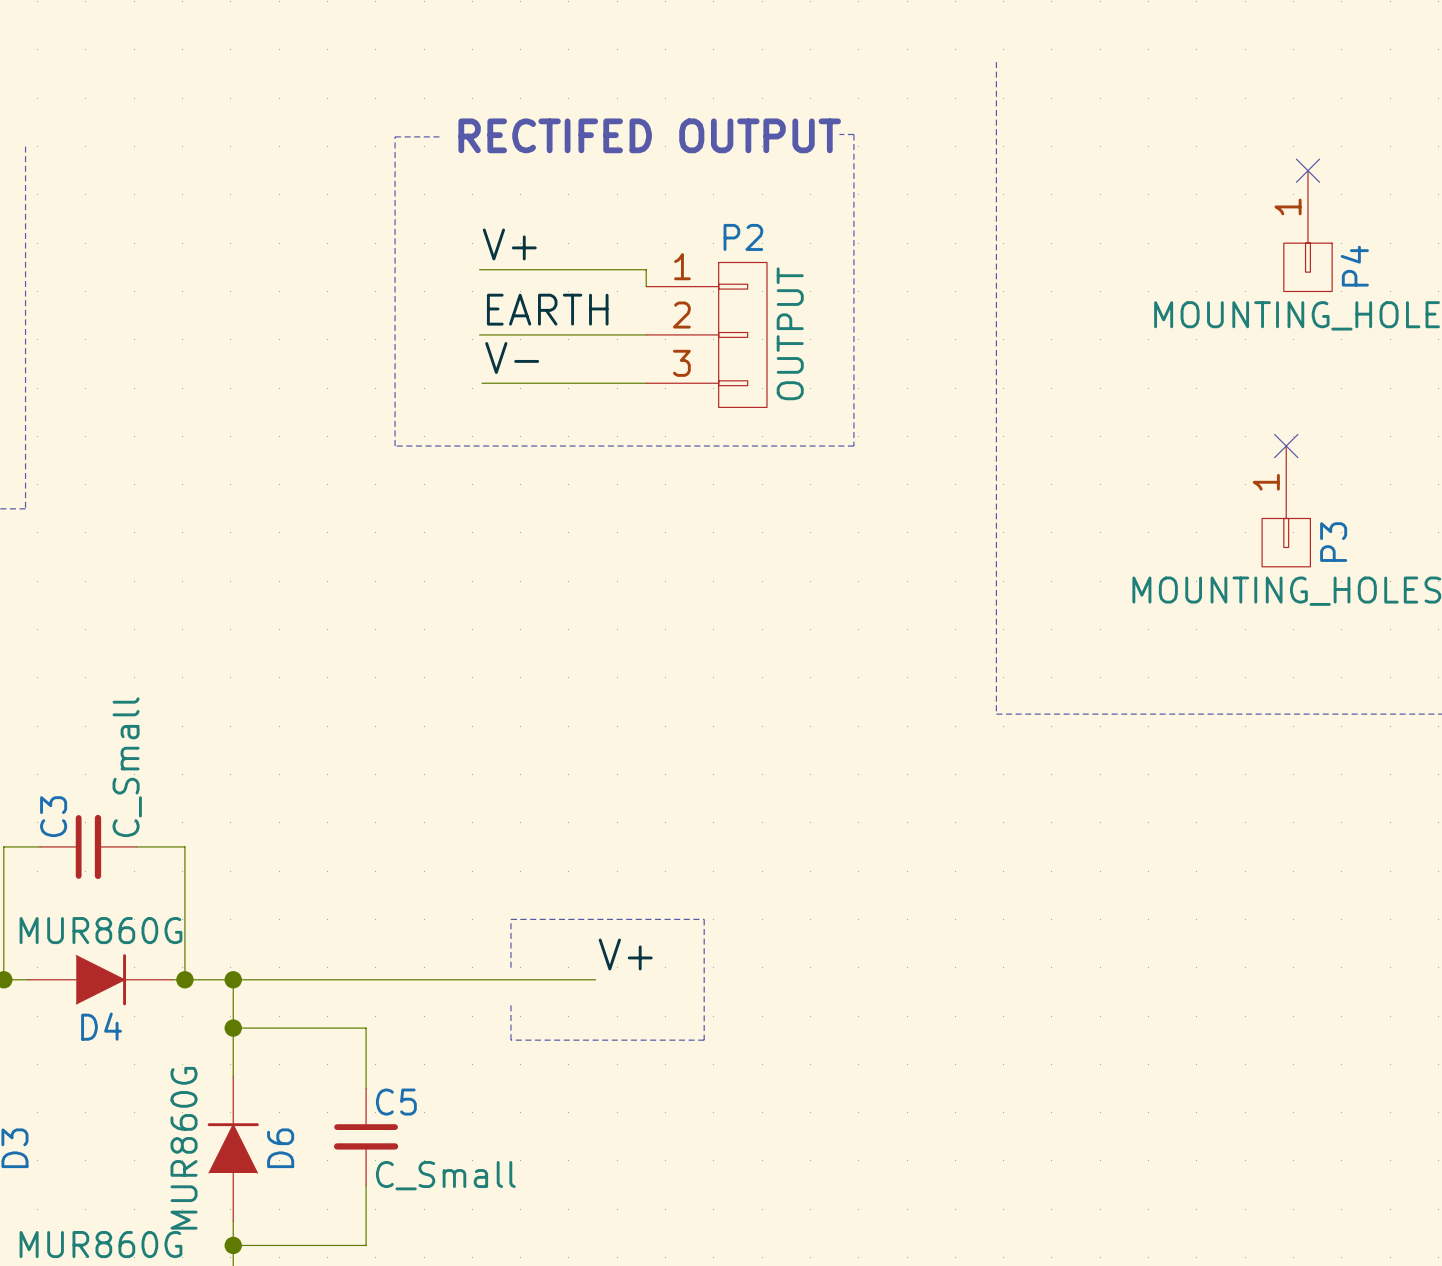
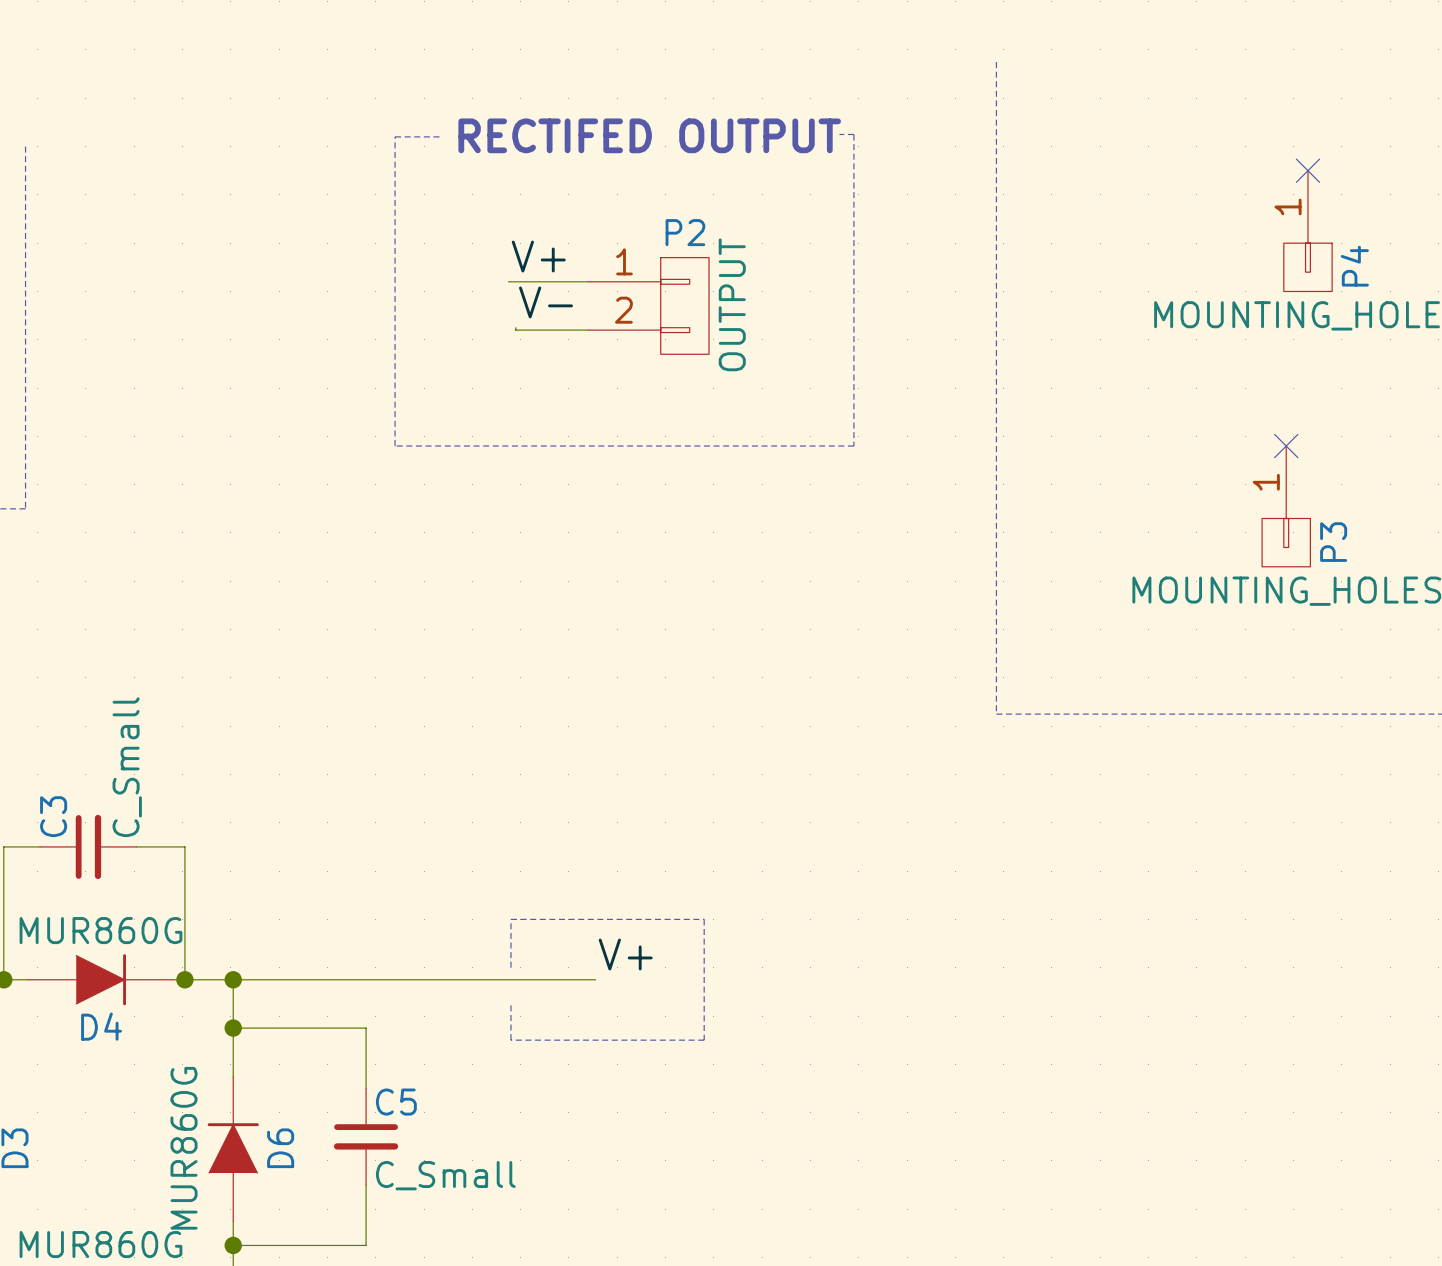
label position: V+ (509, 244) -> V+ (538, 256)
P2 symbol: [646, 262, 767, 408] -> [588, 257, 710, 355]
wire: (479, 269) (646, 269) (646, 286) -> none
wire: none -> (508, 281) (588, 281)
label: EARTH (547, 309) -> none
wire: none -> (515, 327) (515, 330) (588, 330)
wire: (479, 334) (646, 334) -> none
label position: V- (512, 357) -> V- (546, 302)
wire: (481, 383) (646, 383) -> none

